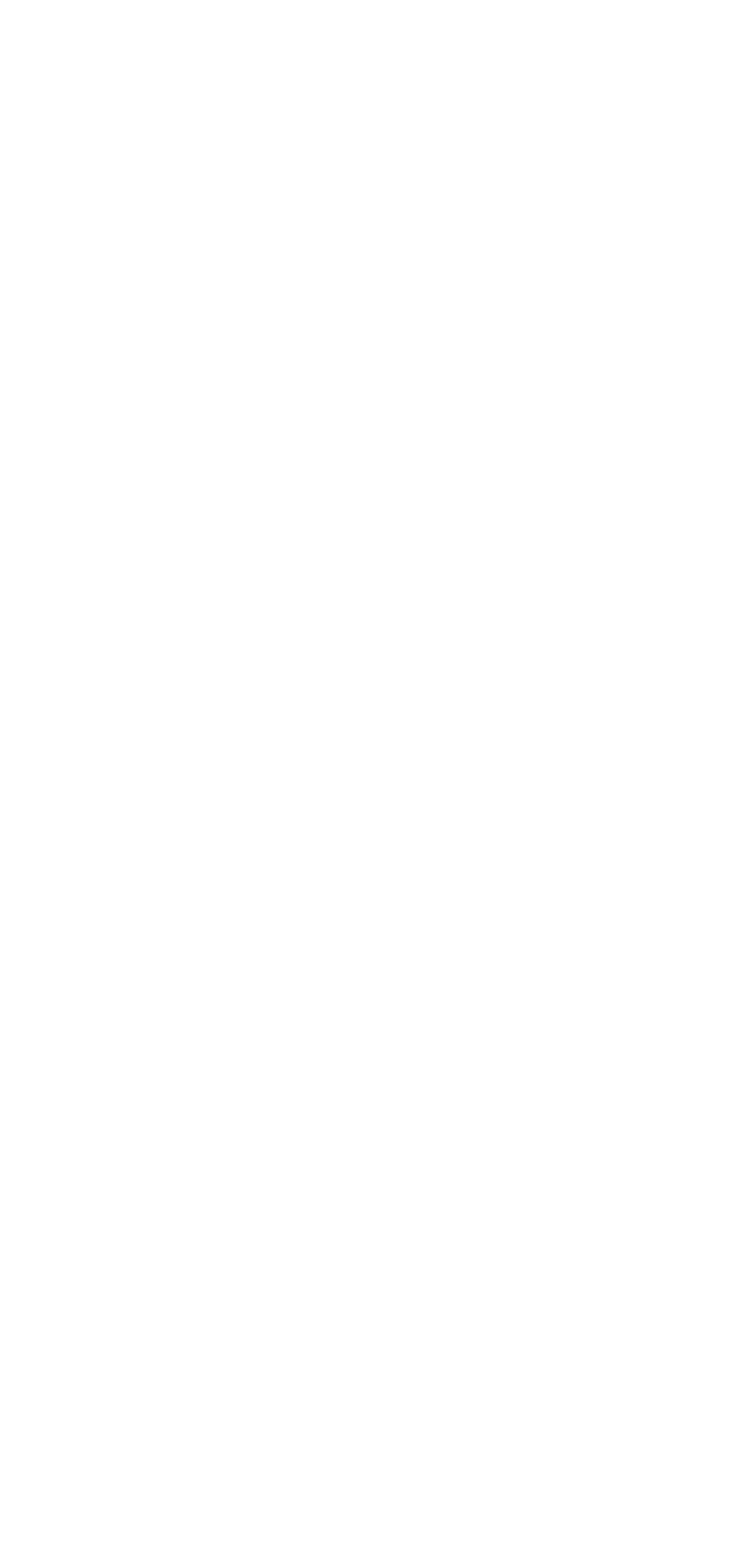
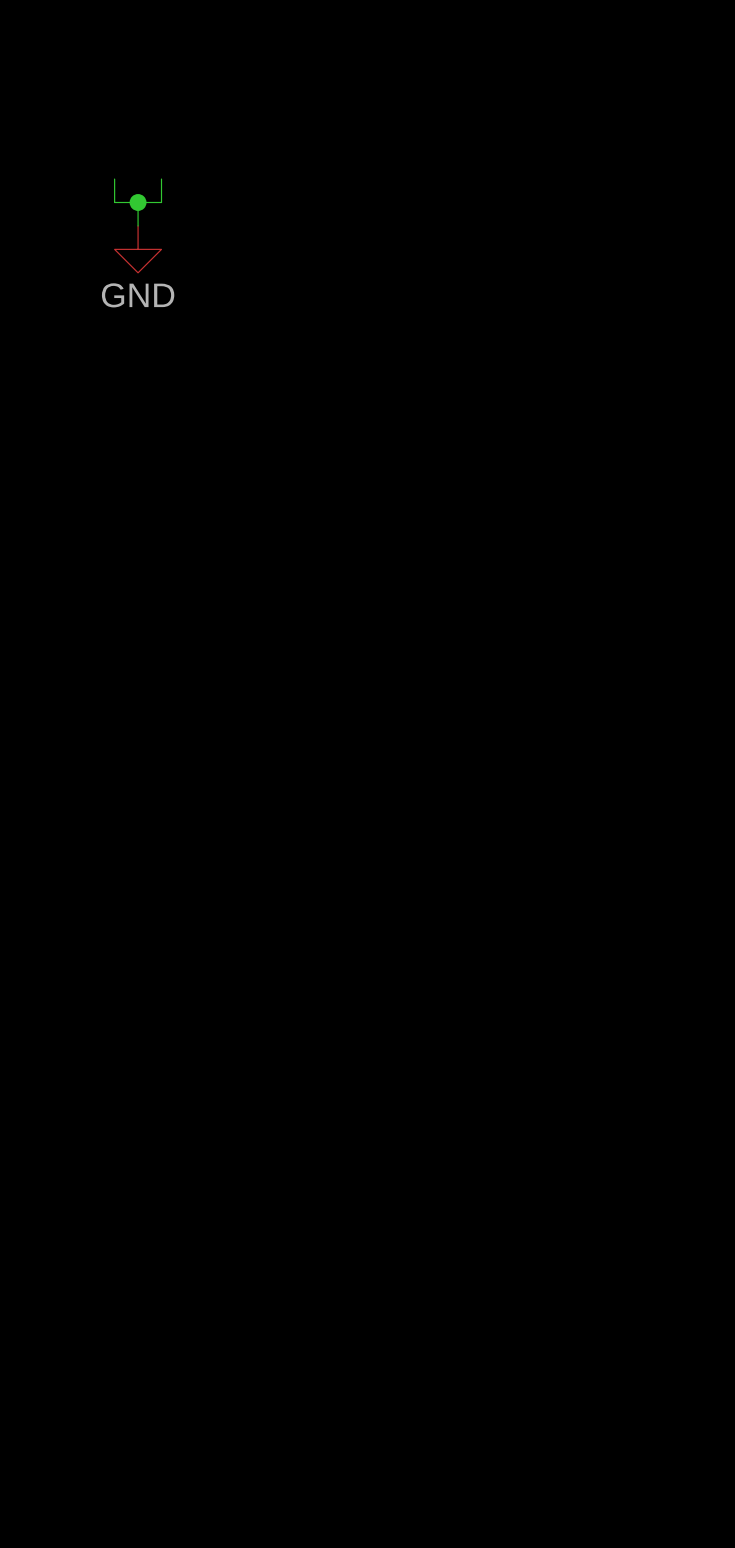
wire: none -> (114, 179) (114, 202) (161, 202) (161, 179)
wire: none -> (138, 202) (138, 225)
junction: none -> (138, 202)
power symbol: none -> GND (138, 249)

